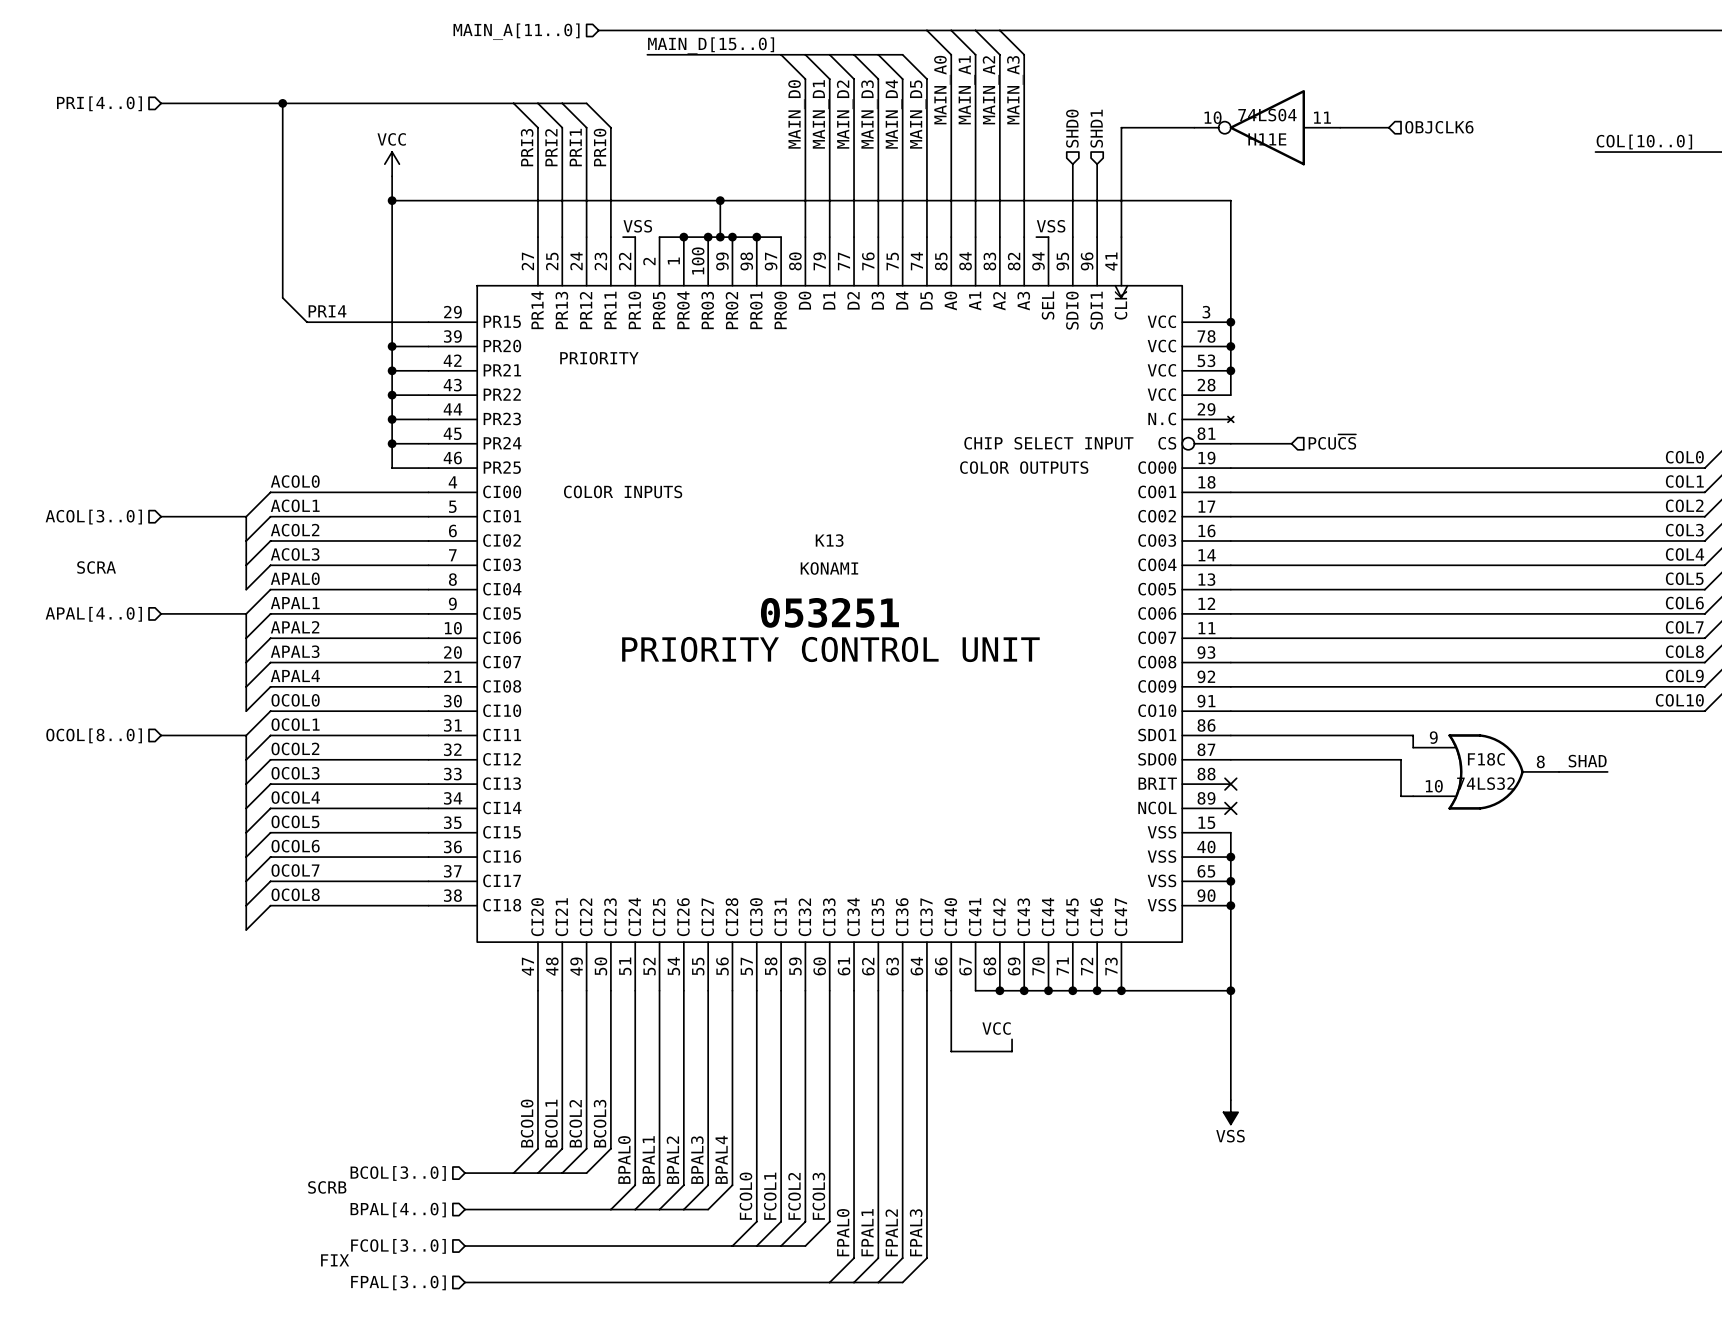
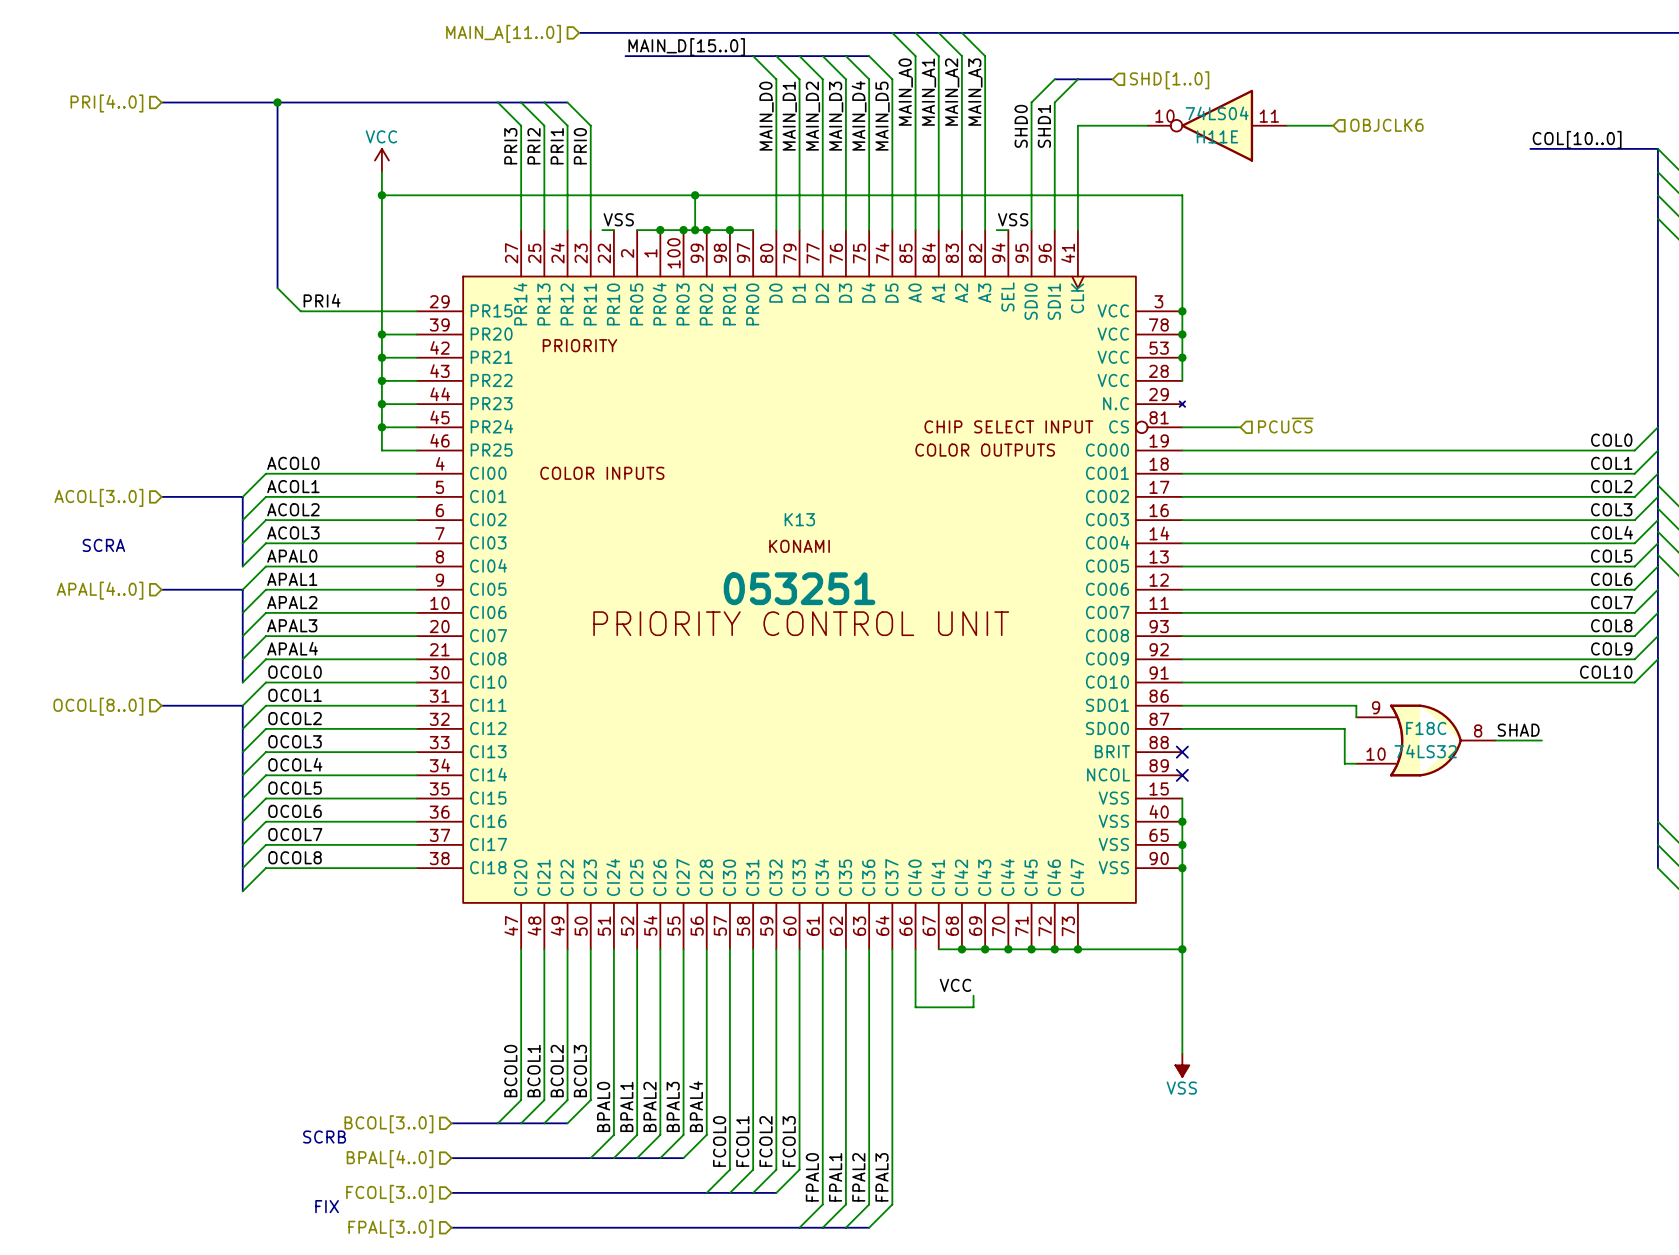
wire: none -> (1054, 79) (1031, 102) (1031, 160)
bus: none -> (1054, 79) (1112, 79)
wire: none -> (1077, 79) (1054, 102) (1054, 160)
hierarchical label: none -> SHD[1..0] (1169, 80)
label: none -> SHD0 (1021, 126)
label: none -> SHD1 (1044, 126)
hierarchical label: SHD0 (1072, 128) -> none
hierarchical label: SHD1 (1096, 128) -> none

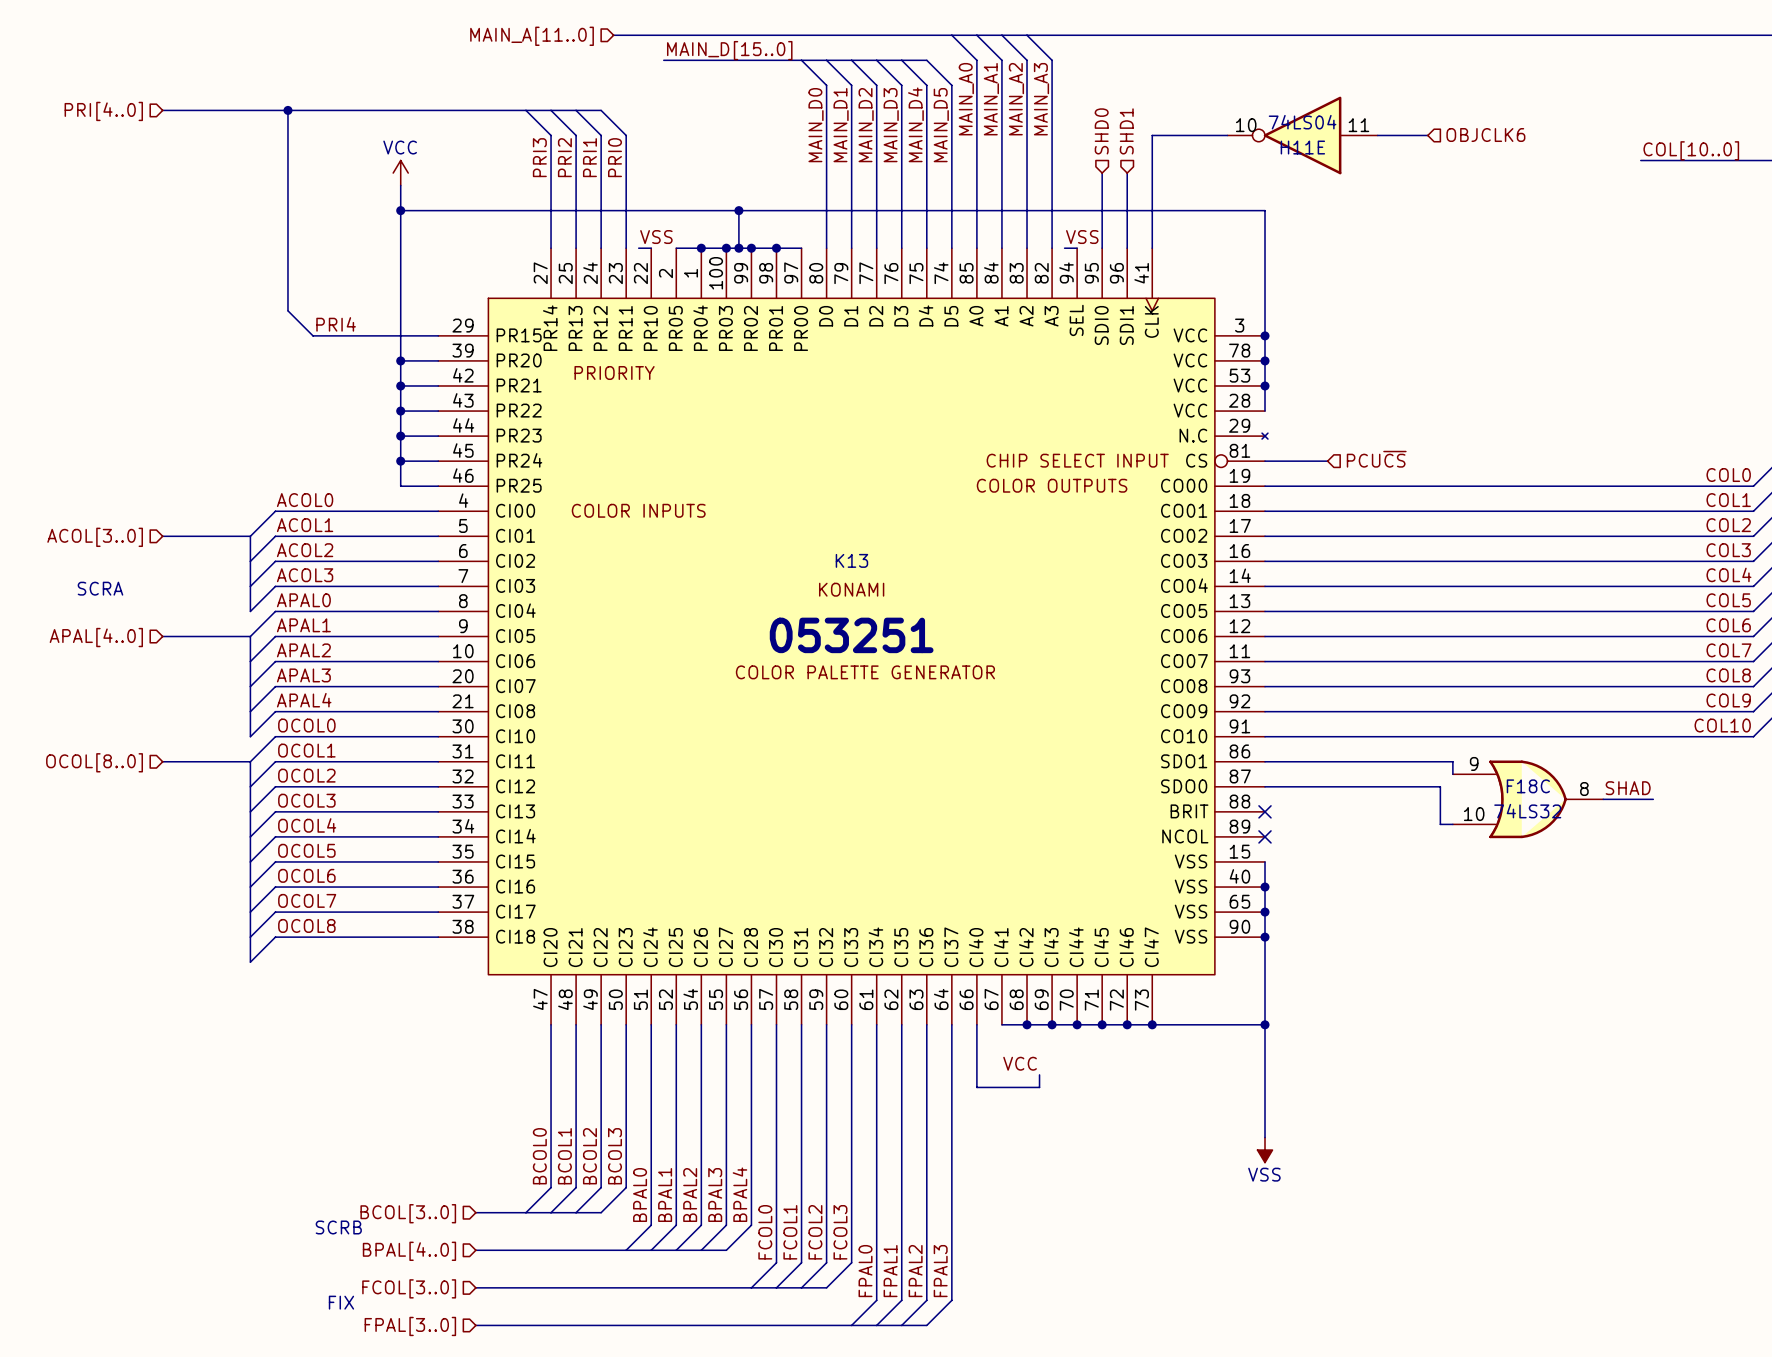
wire: (1054, 79) (1031, 102) (1031, 160) -> none
bus: (1054, 79) (1112, 79) -> none
wire: (1077, 79) (1054, 102) (1054, 160) -> none
hierarchical label: SHD[1..0] (1169, 80) -> none
hierarchical label: none -> SHD0 (1101, 131)
hierarchical label: none -> SHD1 (1126, 131)
label: SHD0 (1021, 126) -> none
label: SHD1 (1044, 126) -> none
K13 text: none -> COLOR PALETTE GENERATOR (865, 672)
K13 text: PRIORITY CONTROL UNIT (801, 623) -> none

